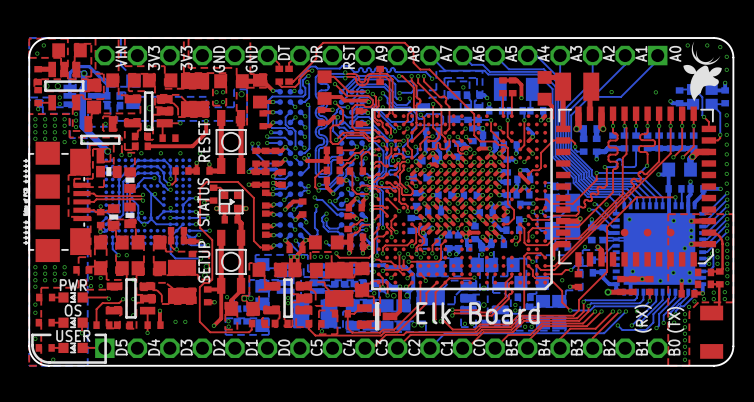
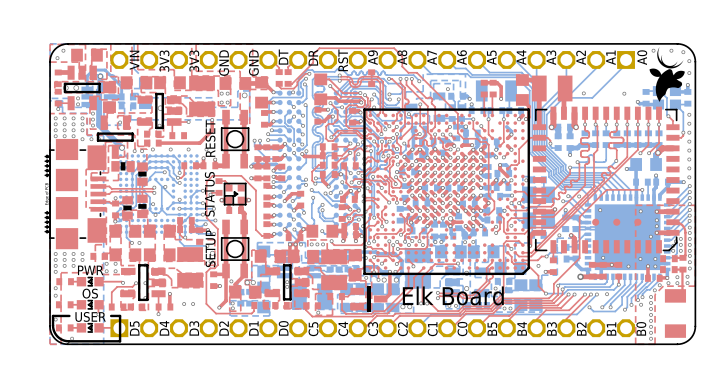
text: (RX) (643, 318) -> none
text: (TX) (675, 319) -> none

